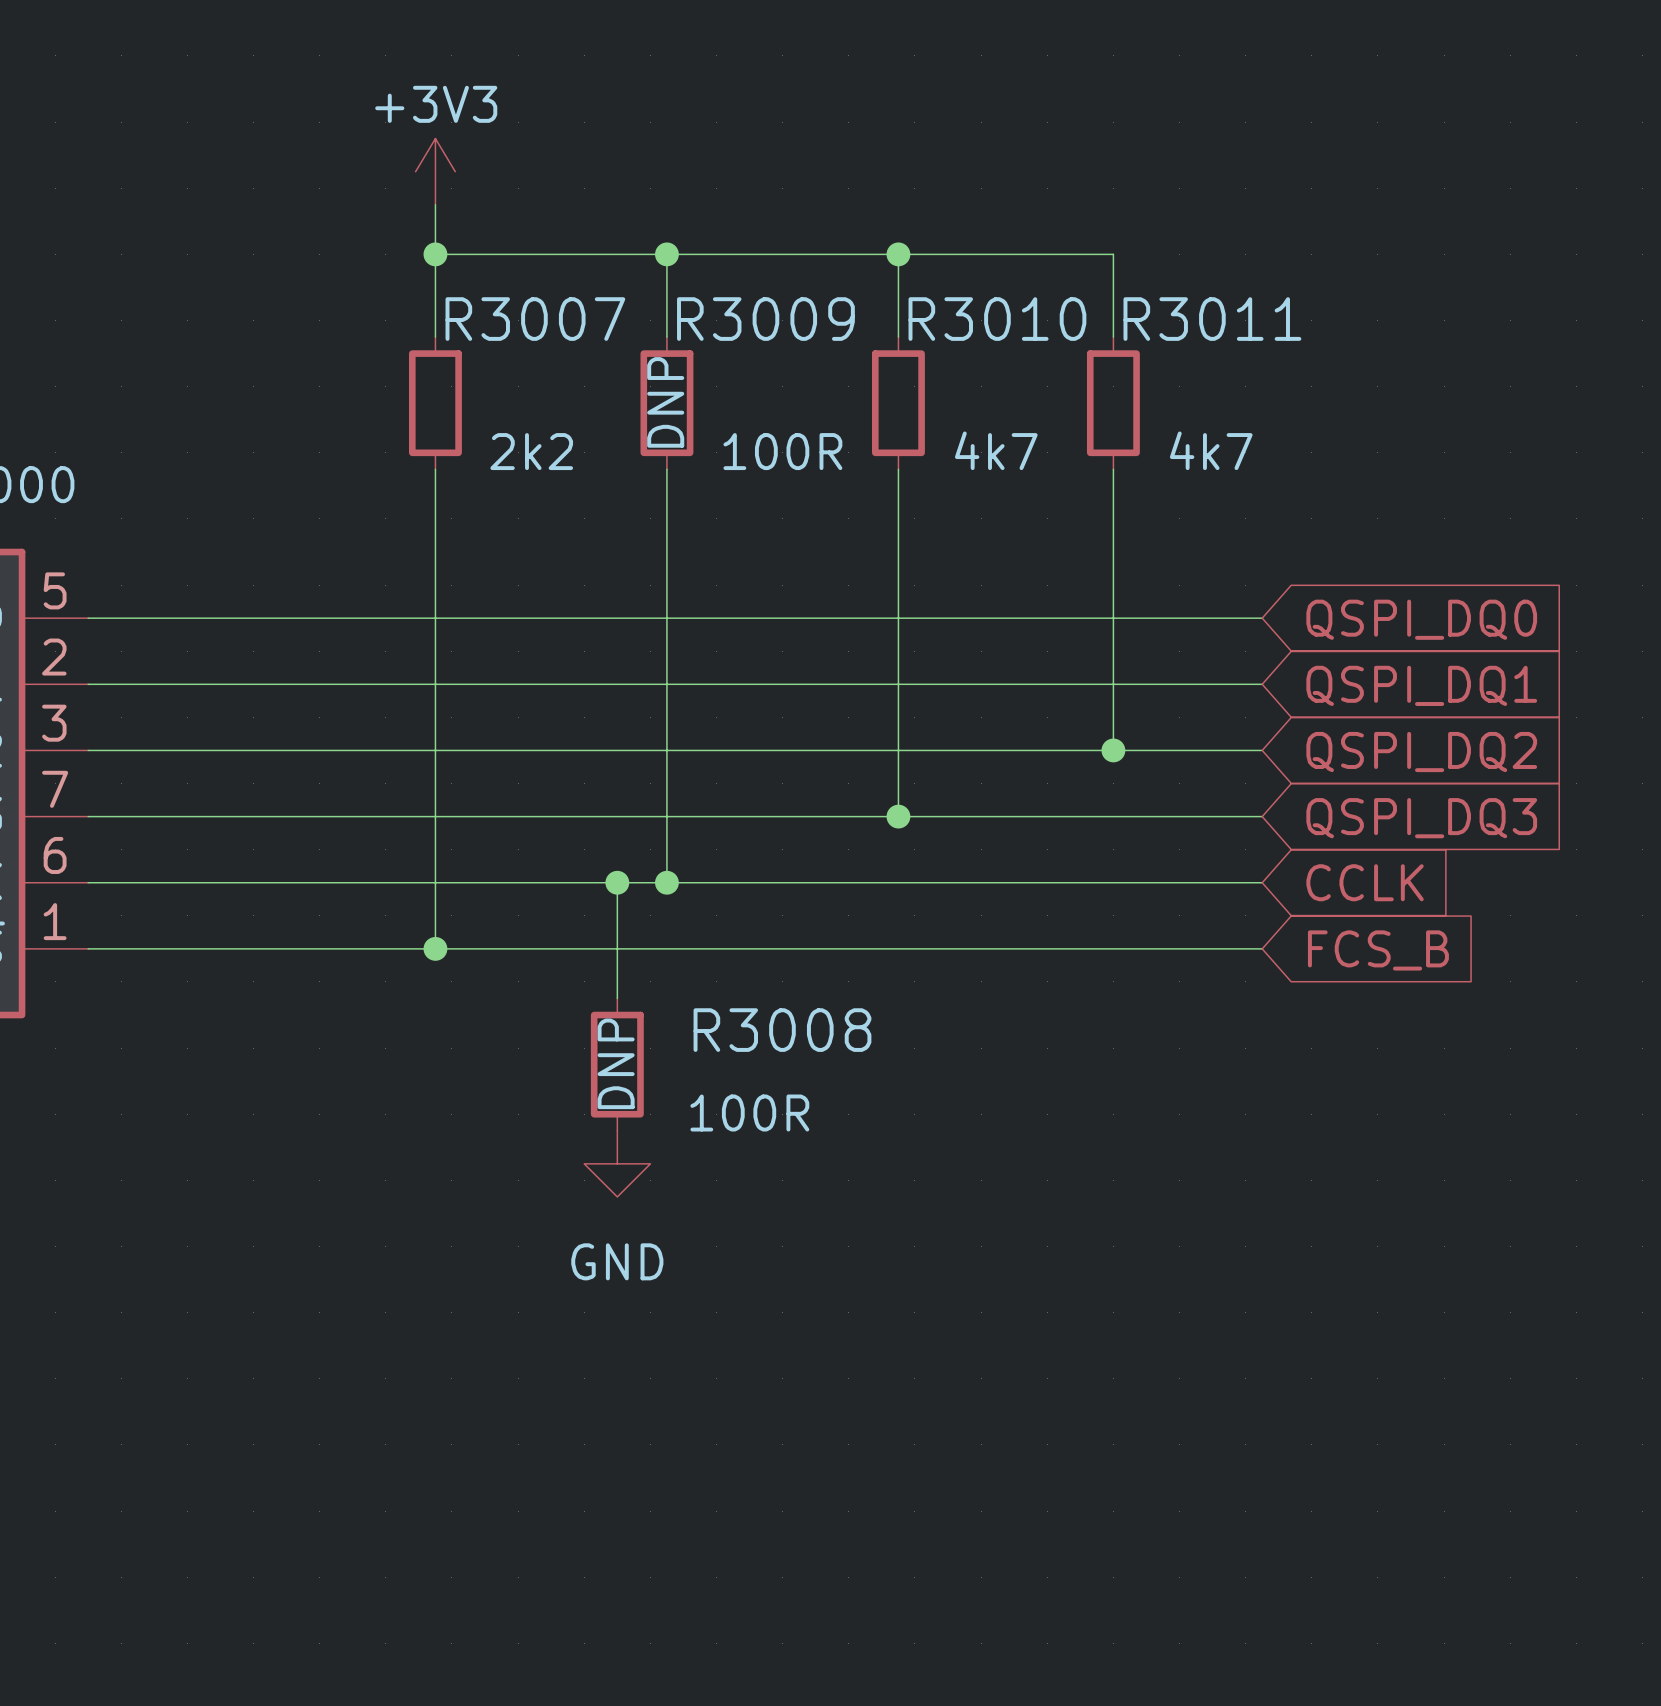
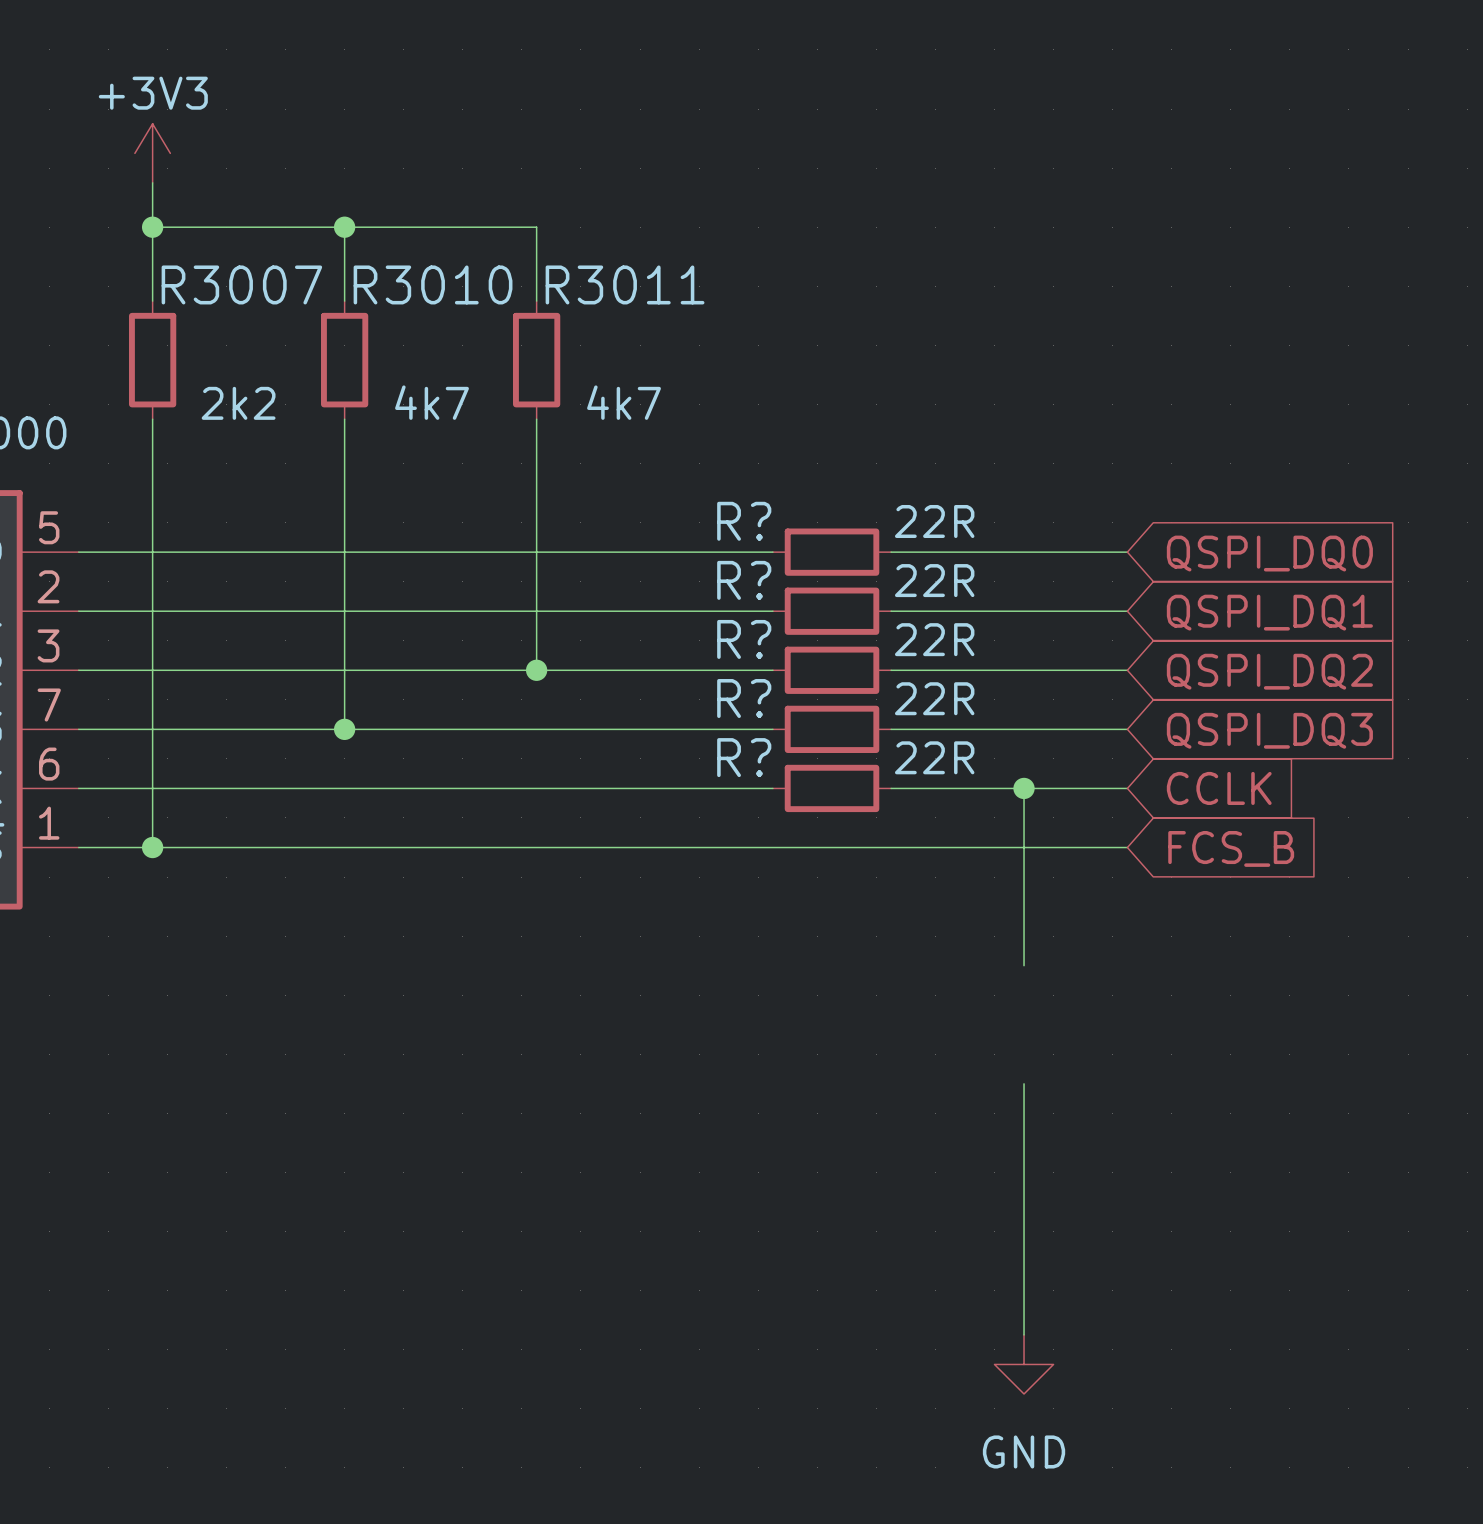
power symbol position: +3V3 (435, 171) -> +3V3 (152, 153)
wire: (435, 204) (435, 337) -> (152, 182) (152, 301)
wire: none -> (152, 227) (388, 227)
junction: none -> (152, 227)
junction position: (435, 254) -> (344, 227)
wire: (600, 254) (1113, 254) (1113, 337) -> (536, 227) (536, 301)
wire: (666, 254) (666, 337) -> none
junction: (666, 254) -> none
wire: (898, 254) (898, 337) -> (344, 227) (344, 301)
junction: (898, 254) -> none
R3007 position: (435, 403) -> (152, 360)
R3009: (666, 403) -> none
R3010 position: (898, 403) -> (344, 360)
R3011 position: (1113, 403) -> (536, 360)
wire: (435, 469) (435, 948) -> (152, 419) (152, 847)
wire: (666, 469) (666, 882) -> none
wire: (898, 469) (898, 816) -> (344, 419) (344, 729)
wire: (1113, 469) (1113, 750) -> (536, 419) (536, 670)
wire: (865, 618) (997, 618) -> none
R?: none -> (832, 552)
wire: (865, 684) (997, 684) -> none
R?: none -> (832, 611)
junction: none -> (536, 670)
wire: (865, 750) (997, 750) -> none
R?: none -> (832, 670)
junction: (1113, 750) -> none
junction: none -> (344, 729)
wire: (865, 816) (997, 816) -> none
junction: (898, 816) -> none
R?: none -> (832, 729)
wire: (617, 882) (617, 998) -> none
junction: (617, 882) -> none
junction: (666, 882) -> none
wire: (865, 882) (997, 882) -> none
R?: none -> (832, 788)
wire: none -> (1024, 788) (1024, 965)
junction: none -> (1024, 788)
junction: none -> (152, 847)
junction: (435, 948) -> none
R3008: (617, 1064) -> none
power symbol position: GND (617, 1163) -> GND (1024, 1364)
wire: none -> (1024, 1083) (1024, 1334)

